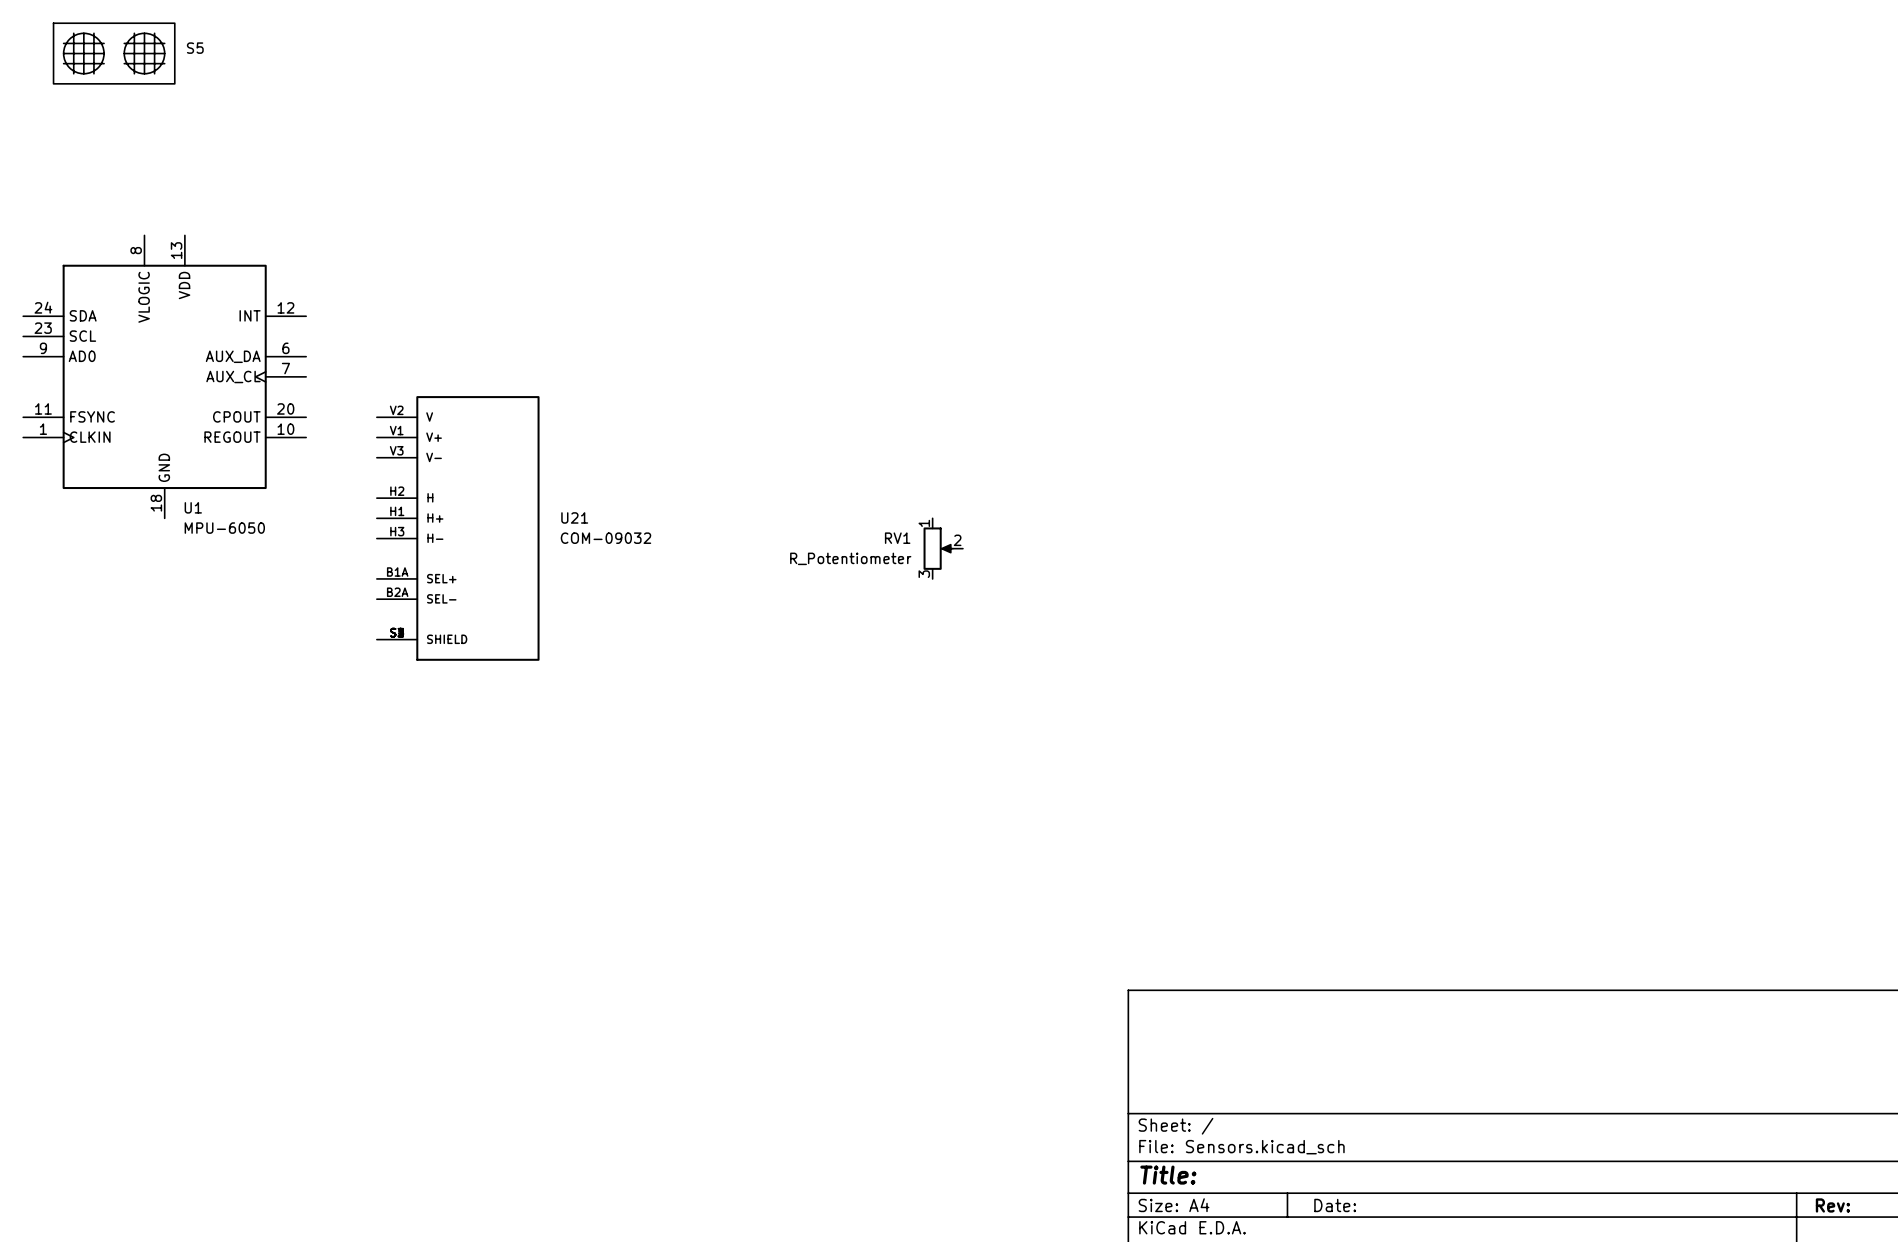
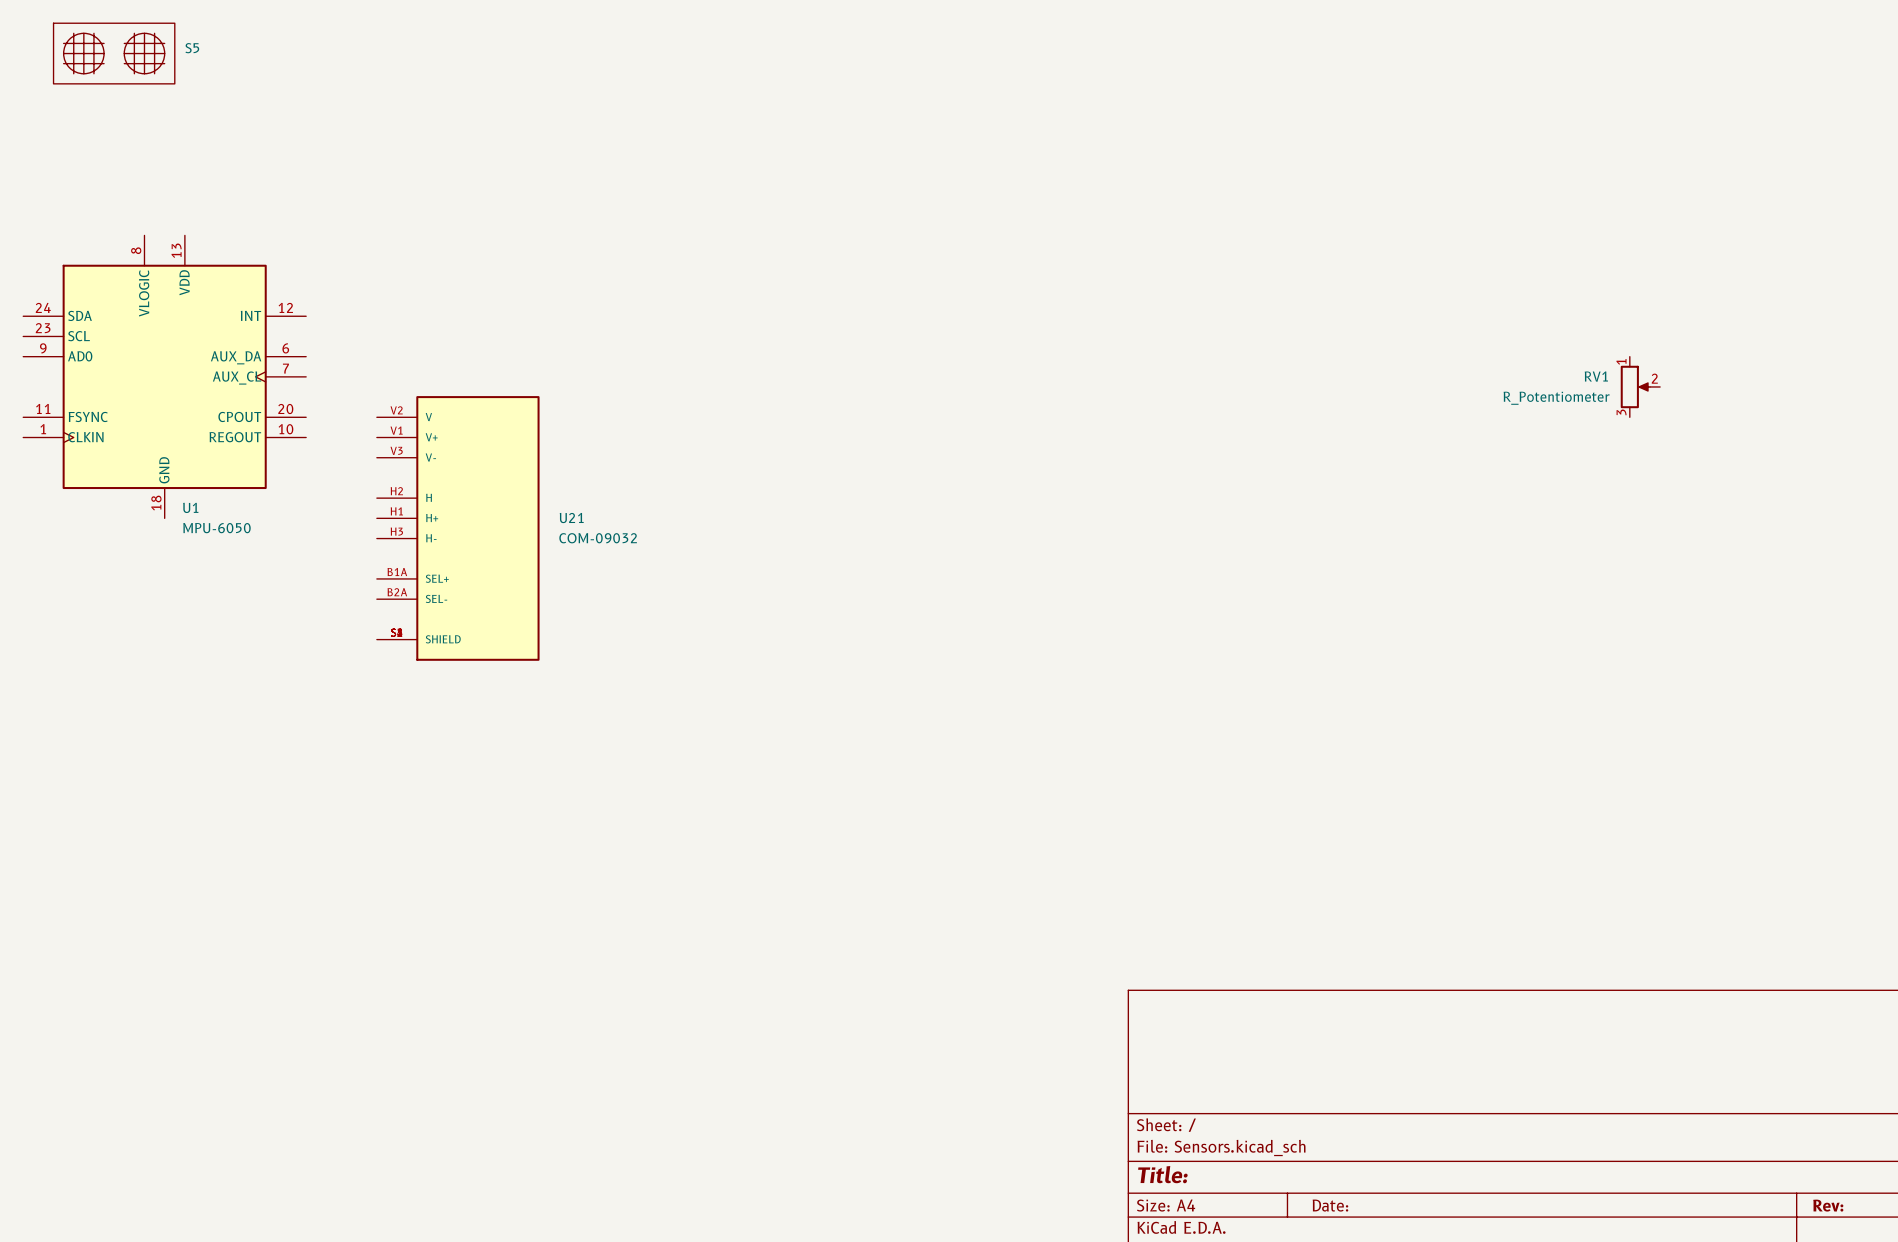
RV1 position: (943, 548) -> (1640, 386)

